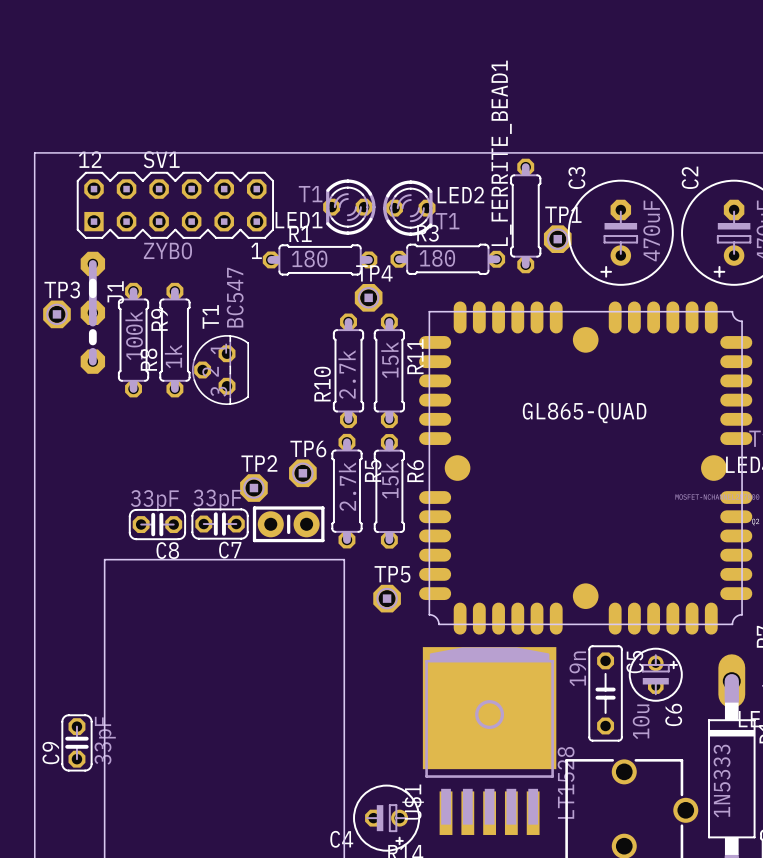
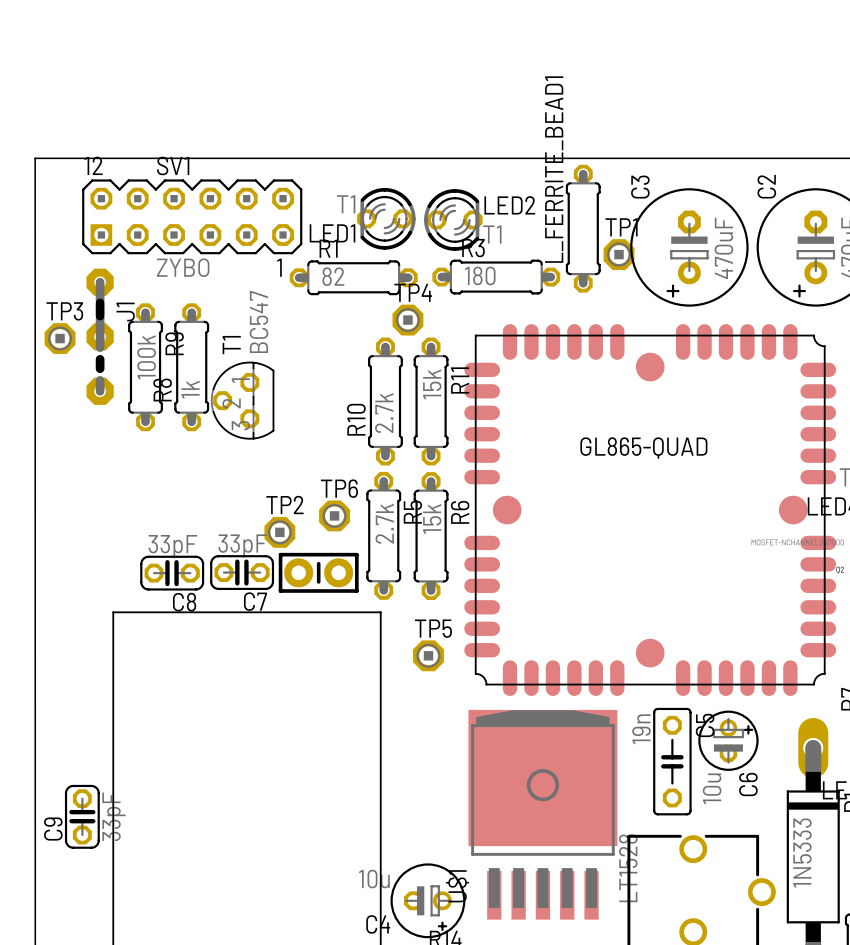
R1 value: 180 (309, 258) -> 82 (333, 276)
C4 value: none -> 10u (374, 879)

